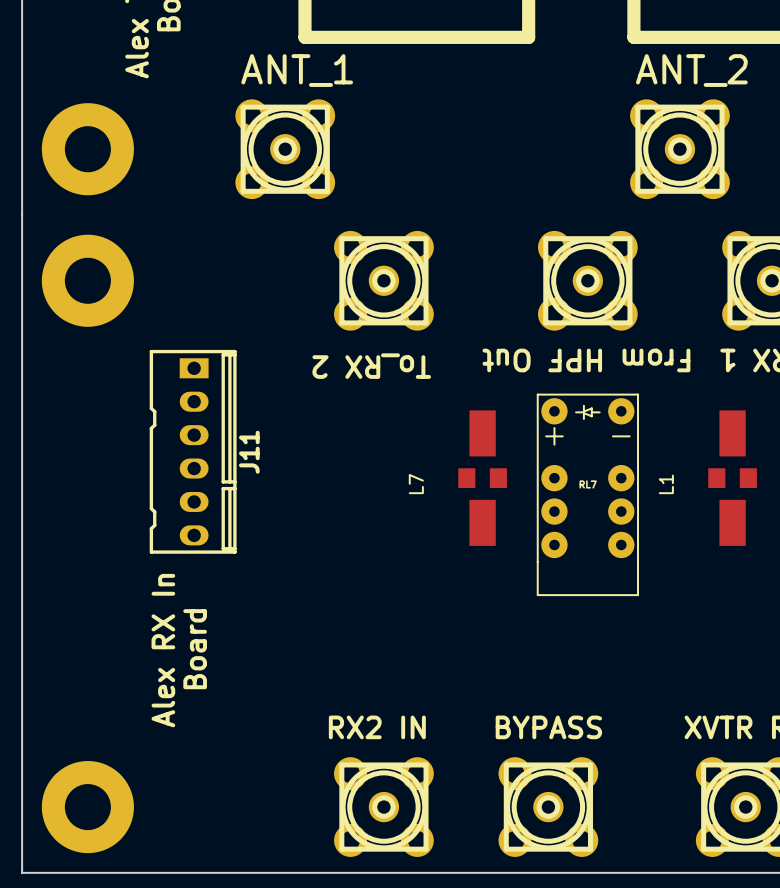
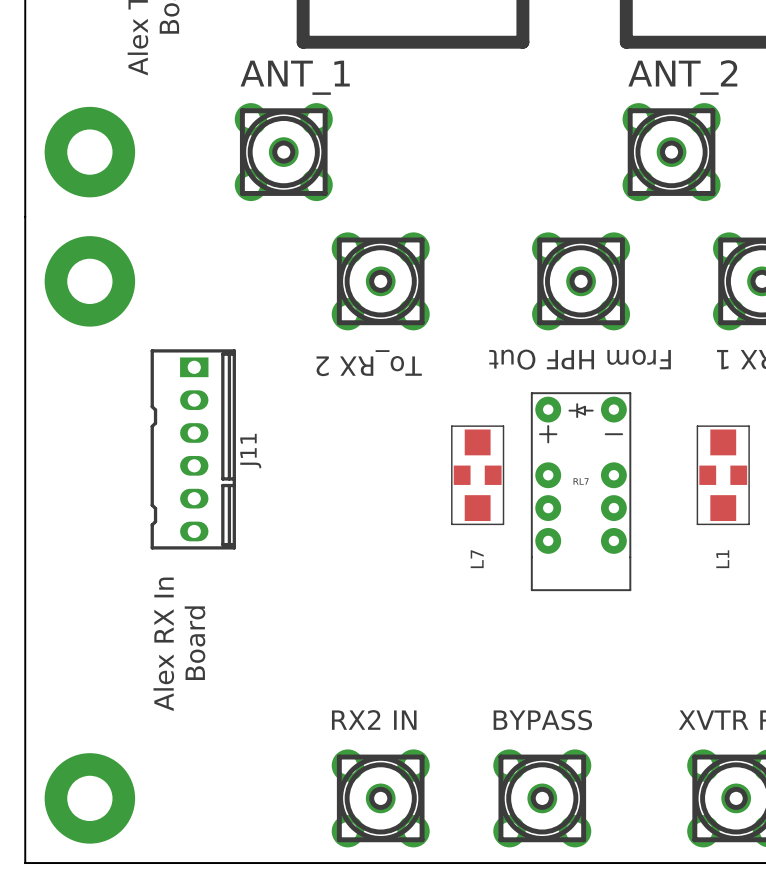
L7 footprint: [458, 410, 507, 546] -> [451, 425, 504, 525]
L1 footprint: [708, 410, 757, 546] -> [697, 425, 750, 525]
L7 name position: L7 (416, 484) -> L7 (477, 559)
L1 name position: L1 (666, 484) -> L1 (722, 559)

